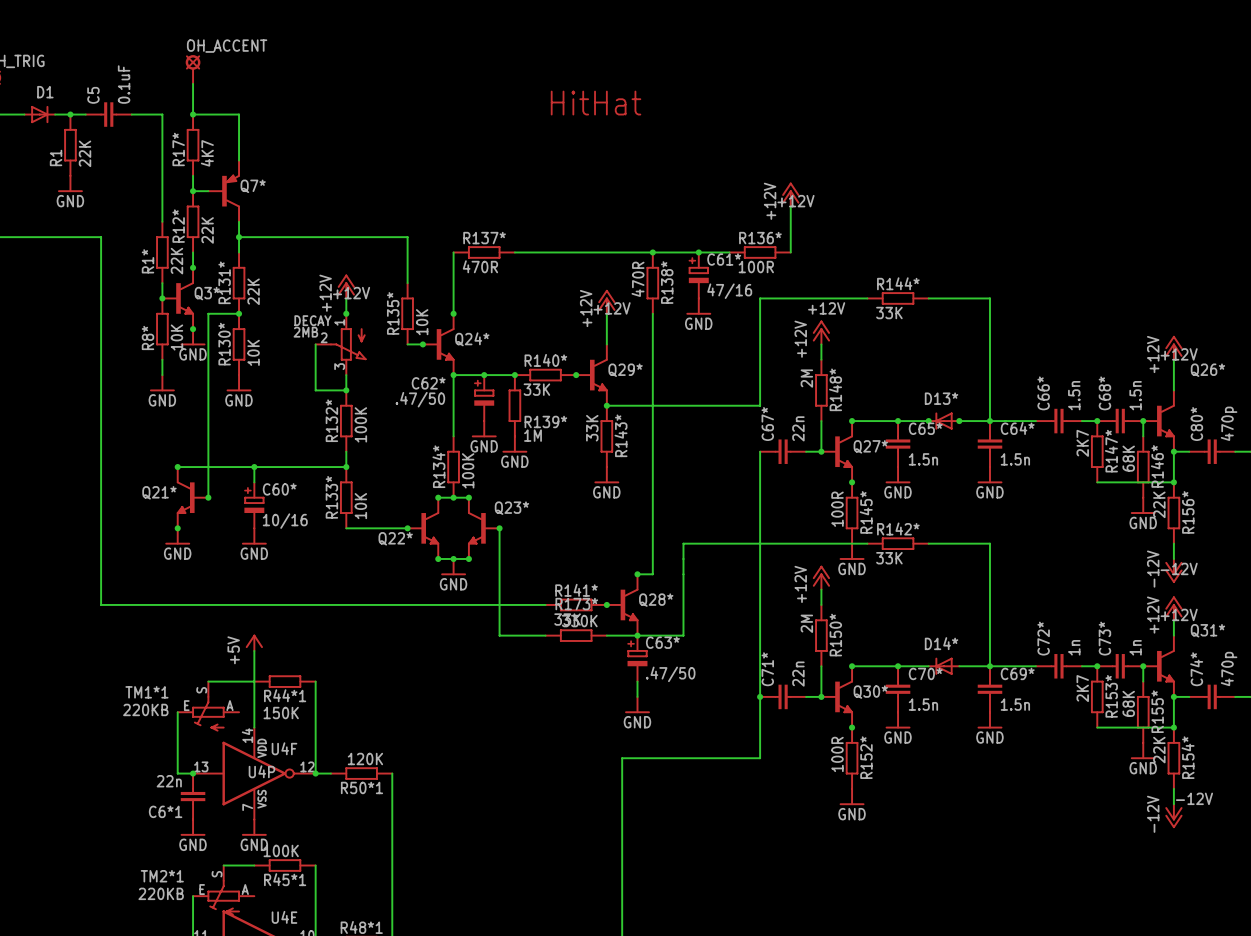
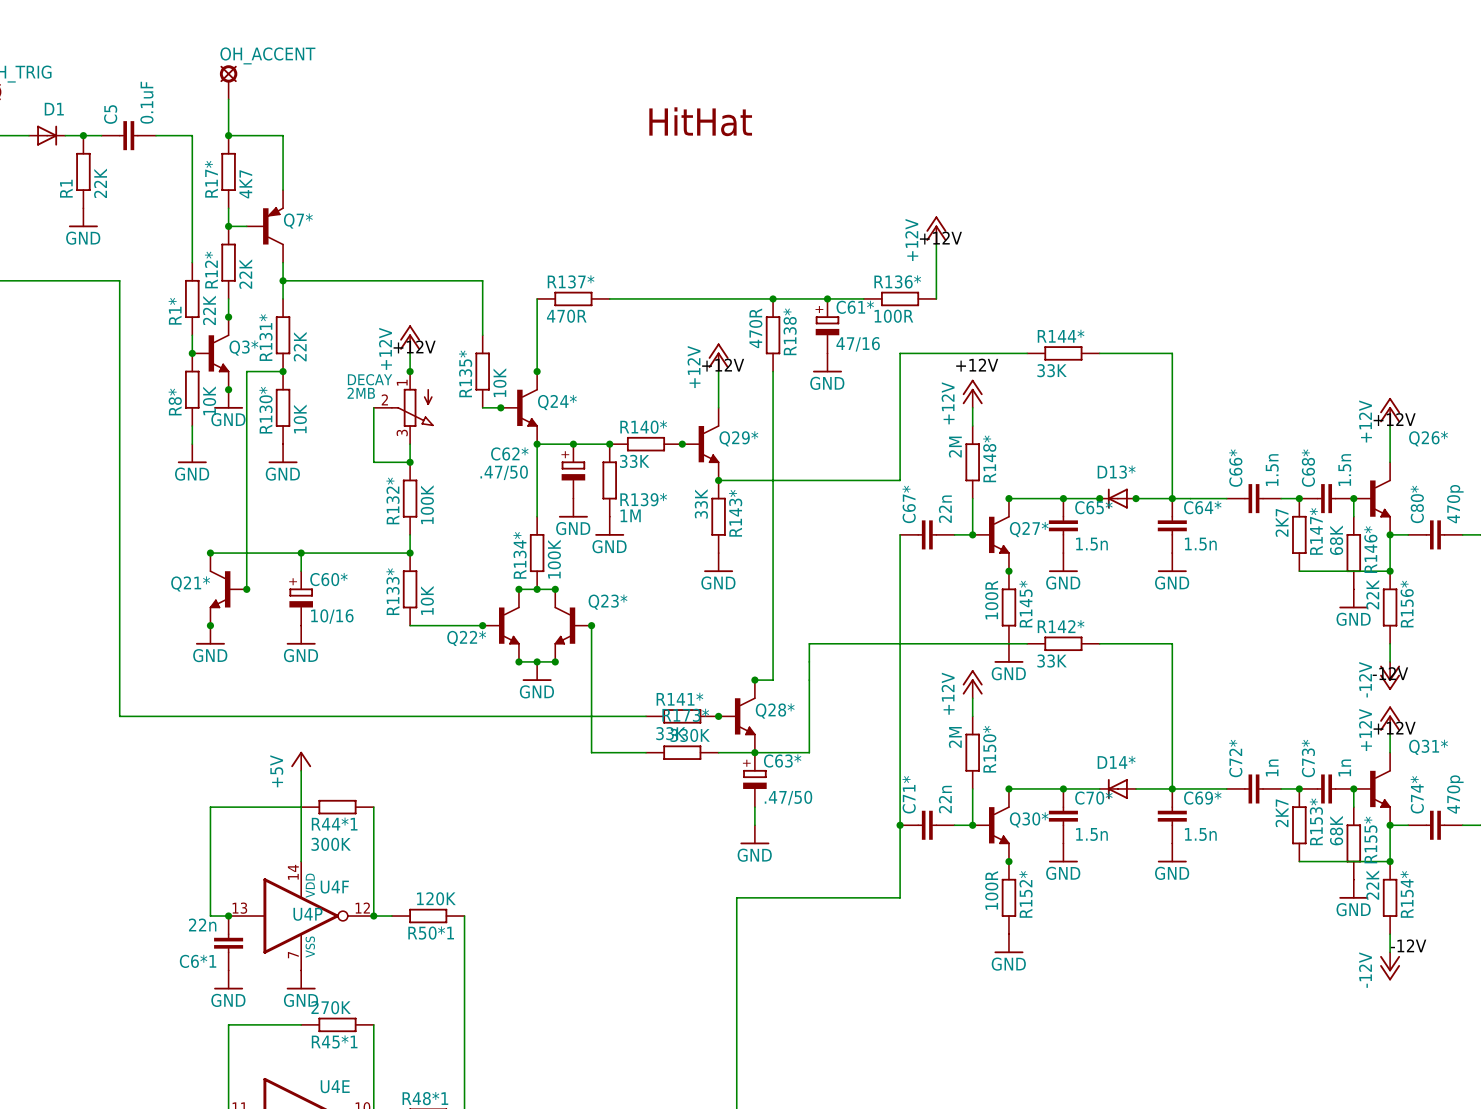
wire: none -> (246, 807) (210, 807) (210, 843)
TM1*1: 220KB (208, 706) -> none
R44*1 value: 150K (281, 713) -> 300K (331, 844)
R45*1 value: 100K (281, 850) -> 270K (331, 1007)
wire: none -> (264, 1024) (228, 1024) (228, 1061)
TM2*1: 220KB (223, 890) -> none

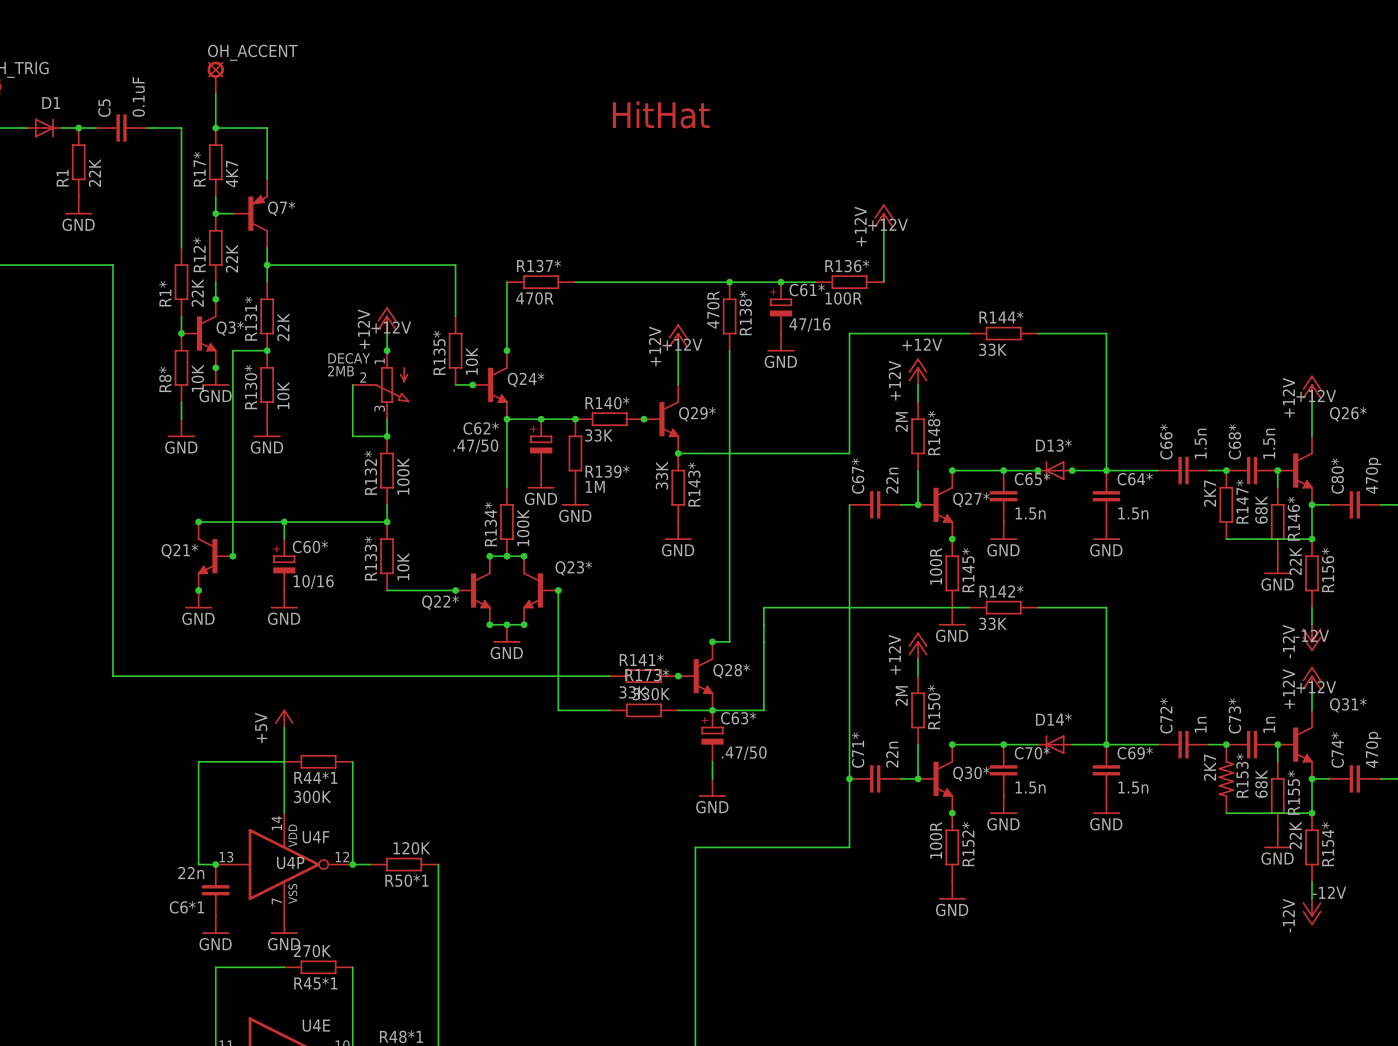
R153* symbol: [1292, 788, 1307, 862] -> [1218, 744, 1234, 814]

